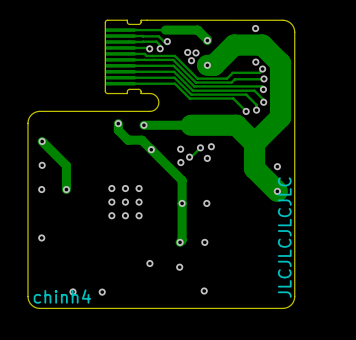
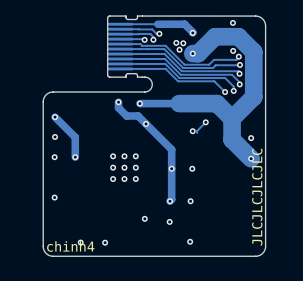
via: (211, 146) -> none
track: (200, 147) (189, 157) -> none
via: (200, 147) -> none
track: none -> (205, 122) (197, 132)
via: none -> (205, 122)
via: (180, 149) -> none
via: (189, 157) -> none
via: (180, 162) -> none

